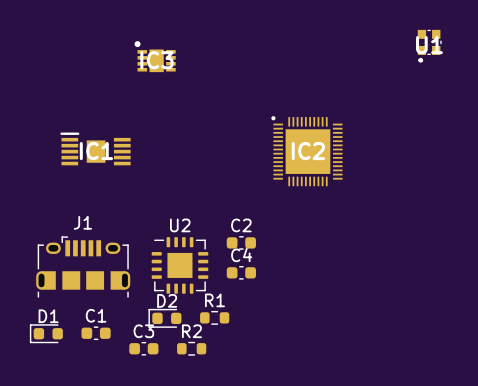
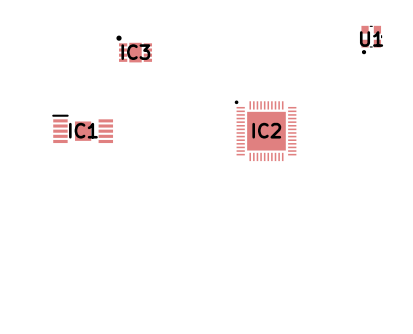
C2: (241, 242) -> none
U2: (179, 265) -> none
J1: (83, 267) -> none
C4: (241, 272) -> none
R1: (214, 317) -> none
D2: (164, 318) -> none
D1: (46, 333) -> none
C1: (96, 333) -> none
C3: (143, 348) -> none
R2: (191, 348) -> none

